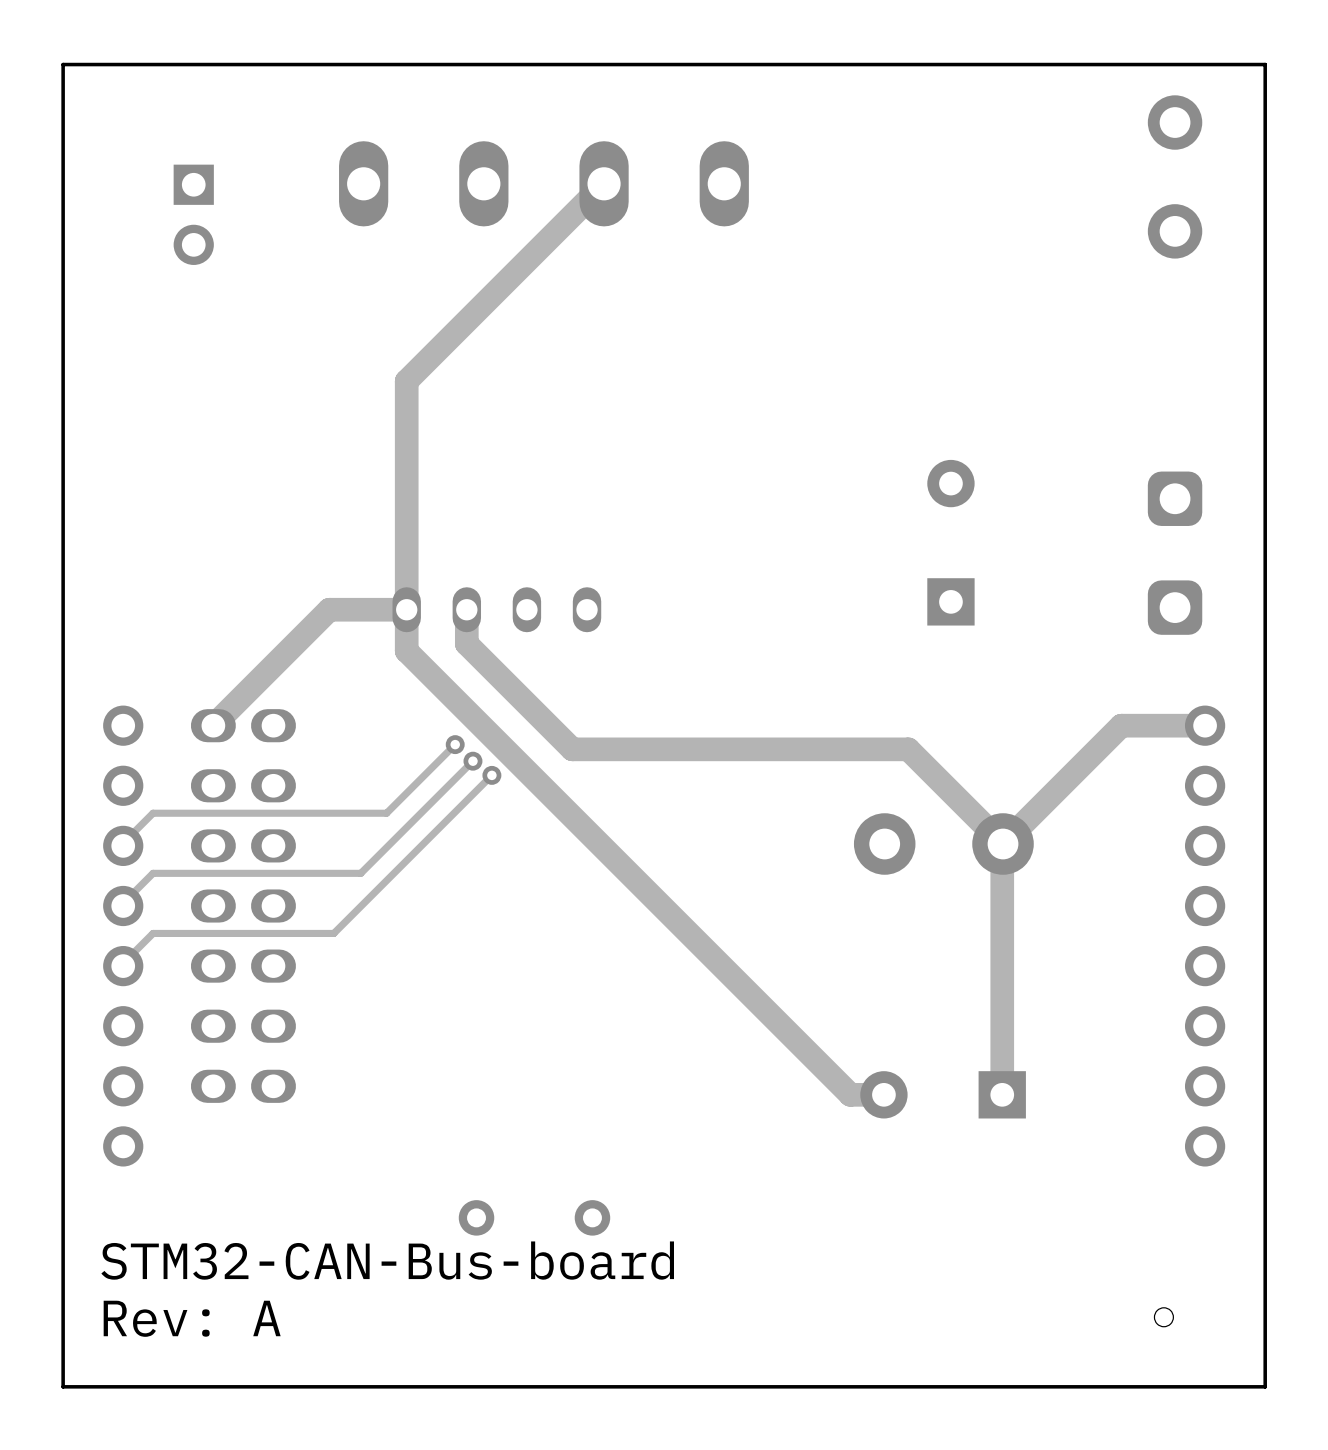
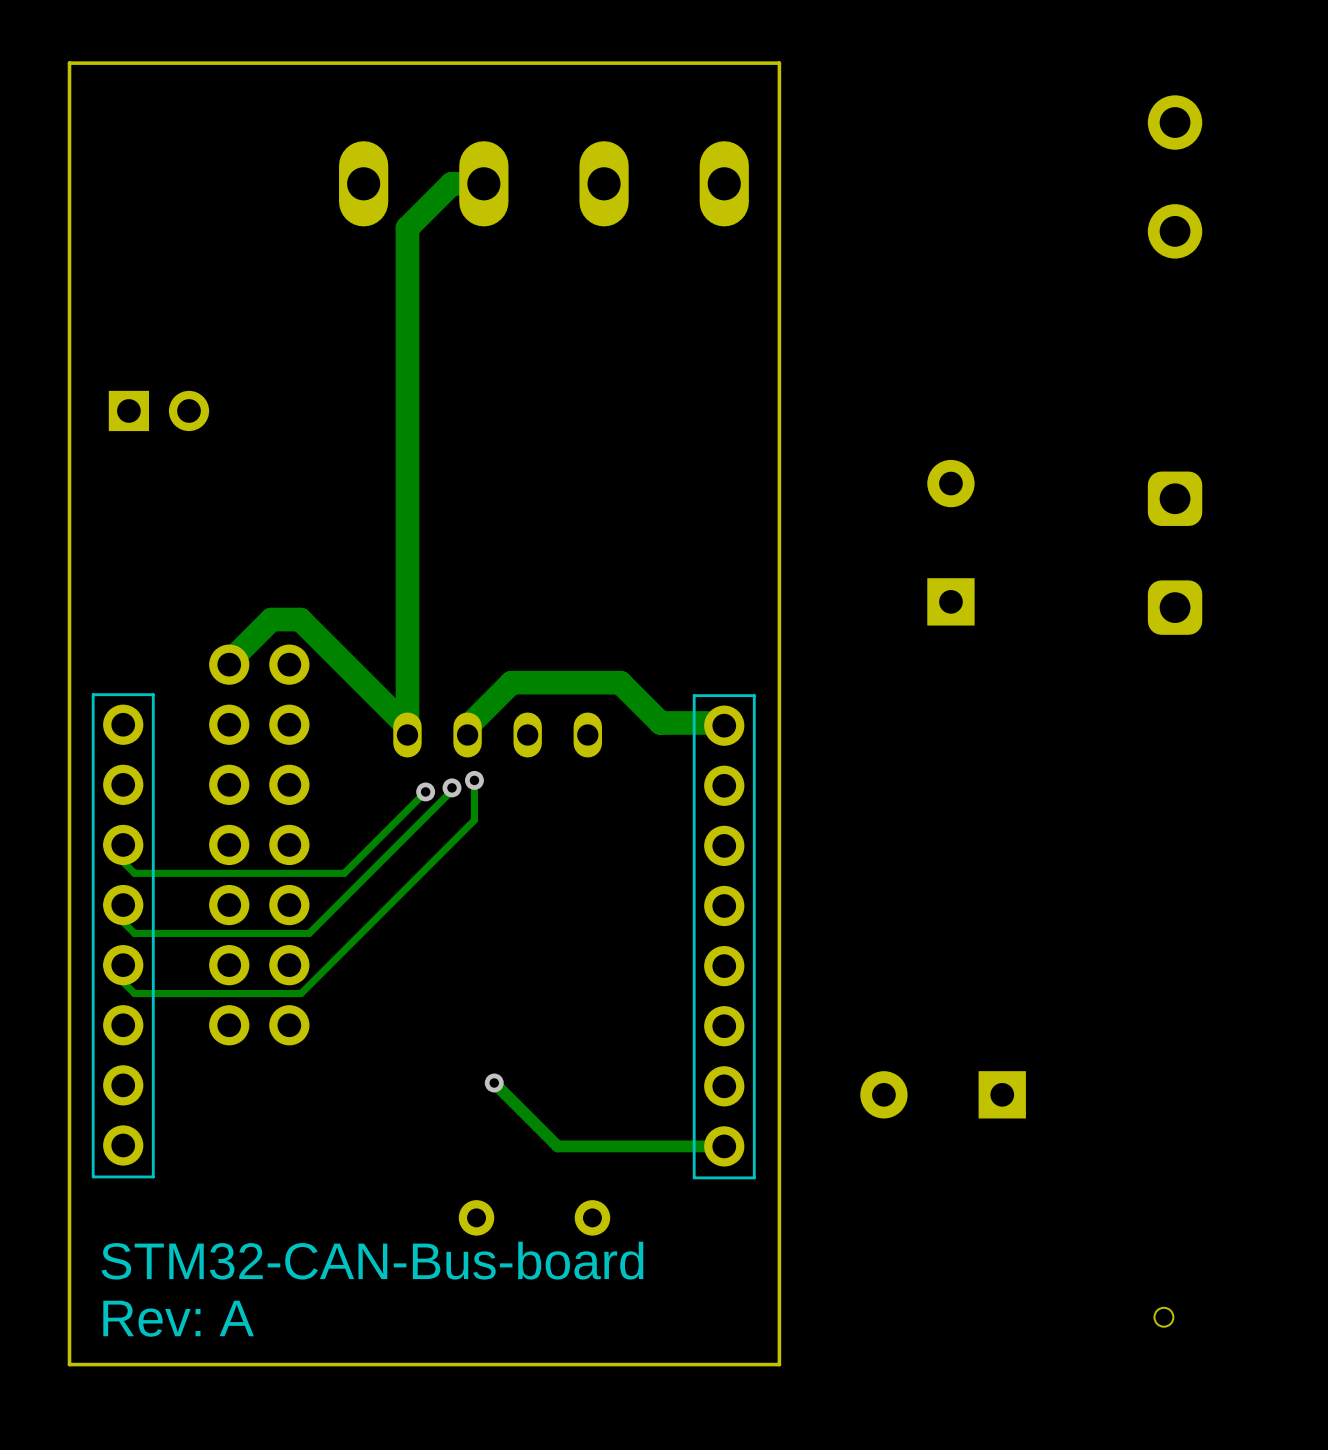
board edge: (1265, 64) (1265, 1386) (63, 1386) (63, 64) (1265, 64) -> (779, 63) (779, 1364) (69, 1364) (69, 63) (779, 63)
track: none -> (483, 183) (451, 183) (407, 227) (407, 734)
track: (604, 183) (406, 381) (406, 651) (850, 1094) (883, 1094) -> none
part rotation: 0° (193, 214) -> 90° counterclockwise (158, 410)
part position: (193, 214) -> (158, 410)
track: (406, 609) (329, 609) (213, 725) -> none
track: (466, 609) (466, 643) (572, 749) (908, 749) (1005, 846) -> none
part position: (496, 609) -> (497, 734)
track: none -> (226, 664) (271, 619) (300, 619) (407, 726)
track: none -> (708, 722) (660, 722) (620, 682) (511, 682) (467, 726)
track: (1205, 725) (1121, 725) (1002, 844) (1002, 1094) -> none
track: (455, 744) (386, 813) (153, 813) (123, 843) -> none
via: (455, 744) -> none
track: (472, 761) (360, 873) (344, 873) -> (425, 791) (344, 873)
via: (472, 761) -> none
track: (491, 775) (333, 933) (309, 933) -> (452, 787) (452, 790) (309, 933)
via position: (491, 775) -> (474, 780)
track: none -> (474, 780) (474, 820) (301, 993) (134, 993) (106, 965)
via: none -> (452, 787)
via: none -> (425, 791)
part: none -> (259, 844)
part: (943, 844) -> none
track: (153, 873) (123, 903) -> (153, 873) (134, 873) (106, 844)
part: (243, 906) -> none
track: (153, 933) (123, 963) -> (153, 933) (134, 933) (106, 905)
part side: top (123, 936) -> bottom (123, 935)
part side: top (1205, 936) -> bottom (724, 936)
track: none -> (494, 1082) (557, 1146) (708, 1146)
via: none -> (494, 1082)

